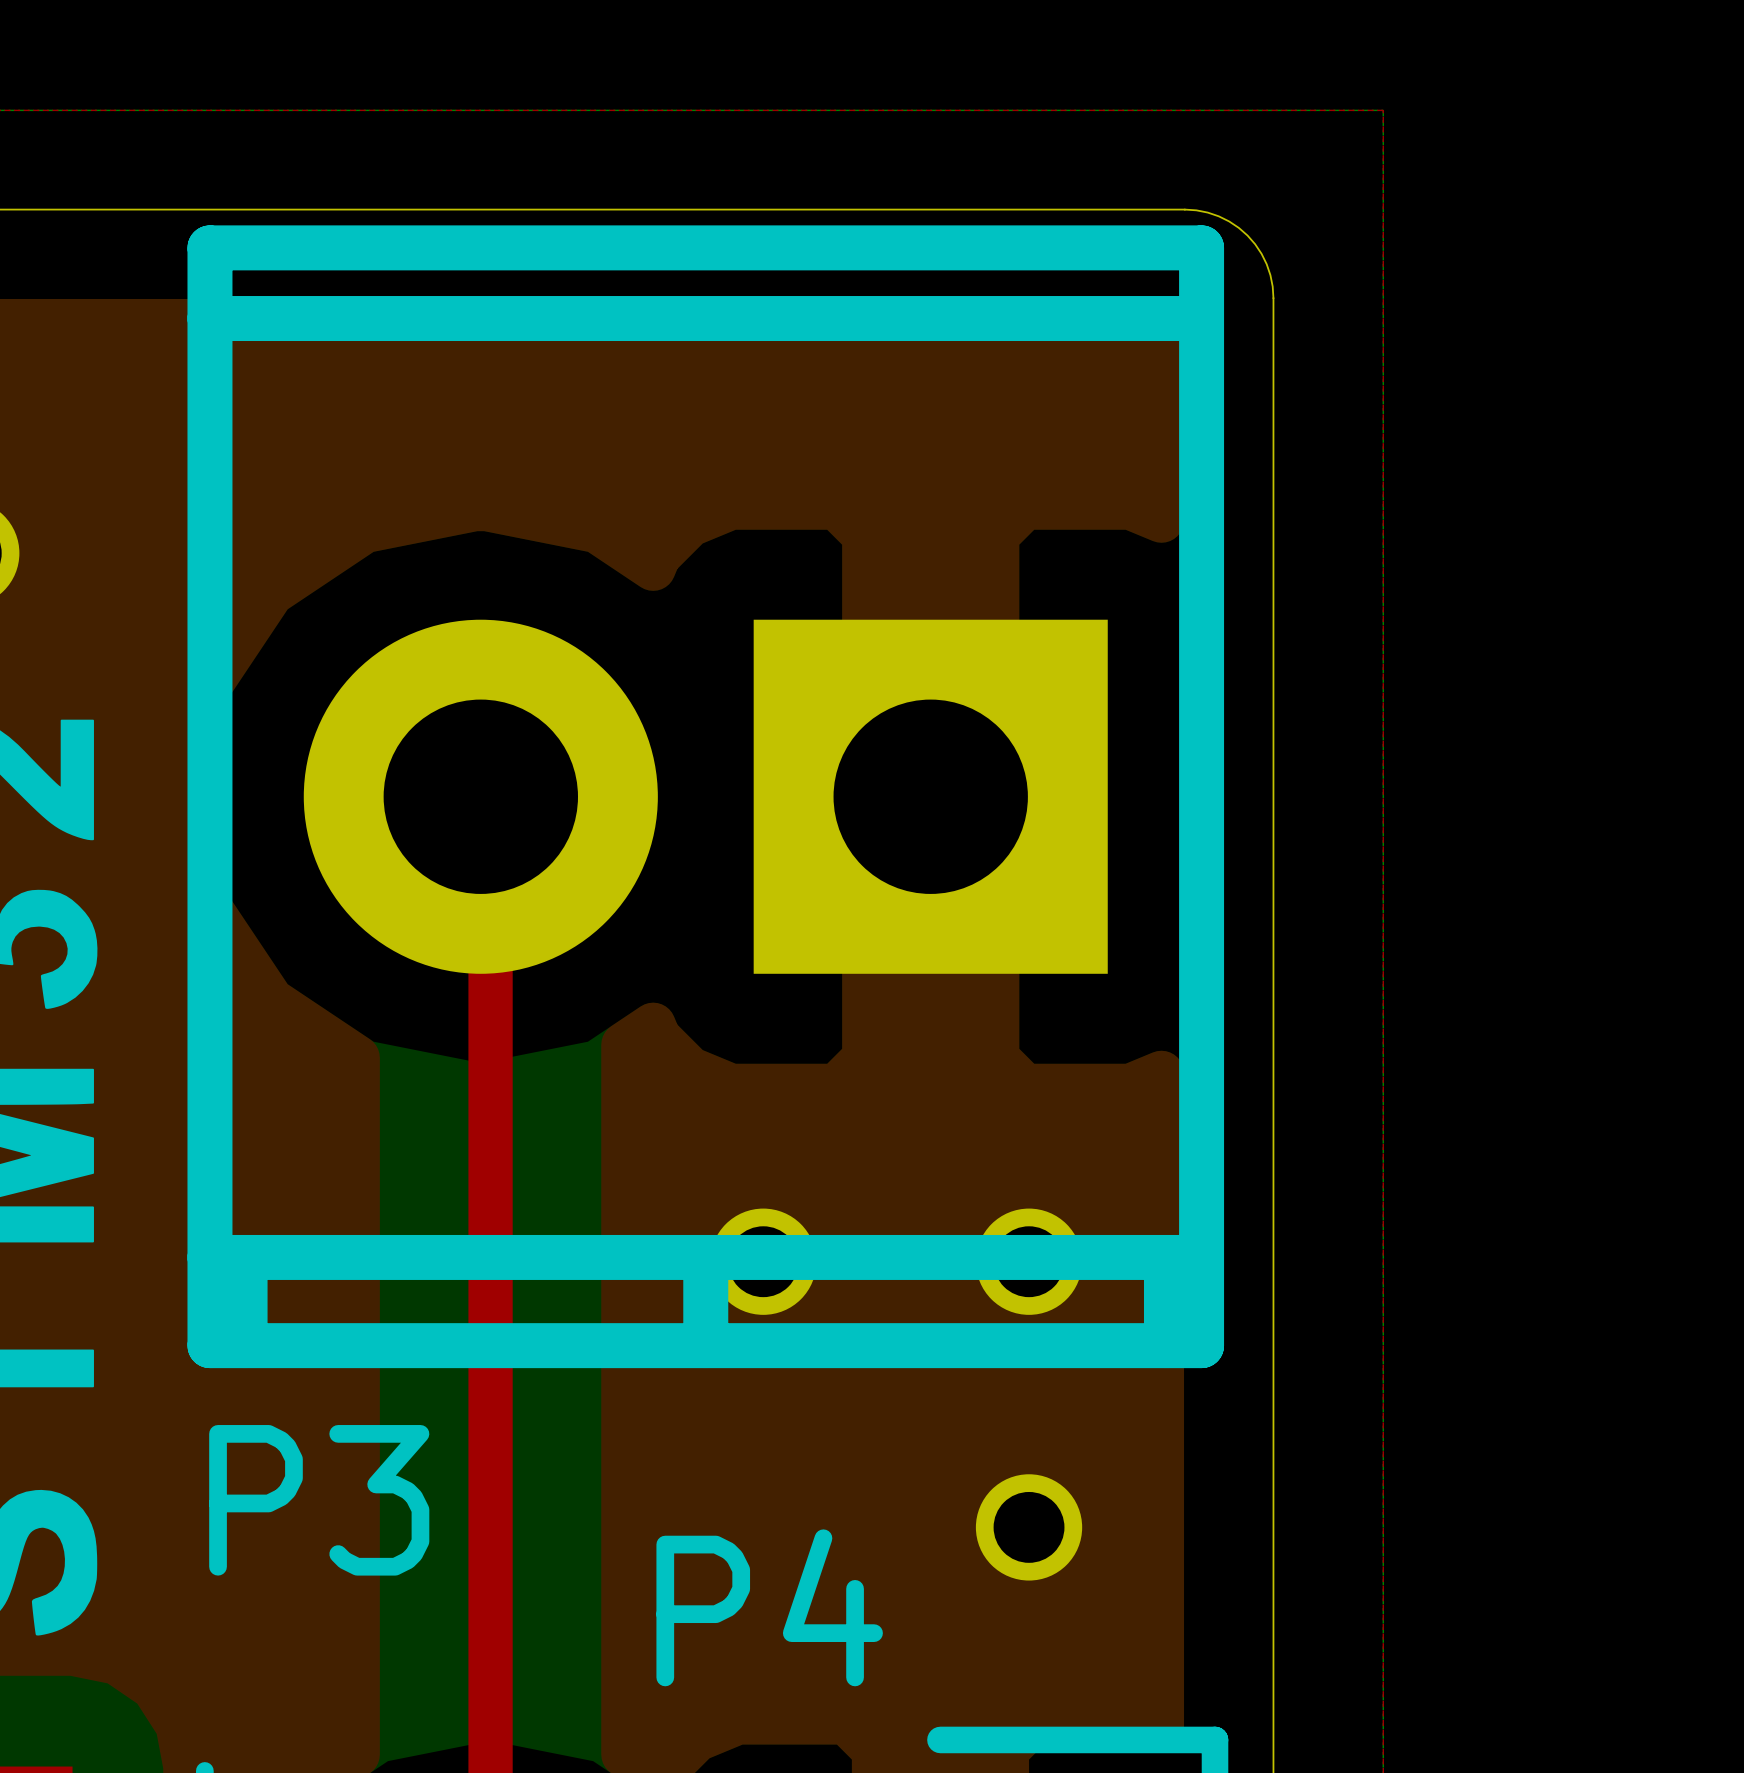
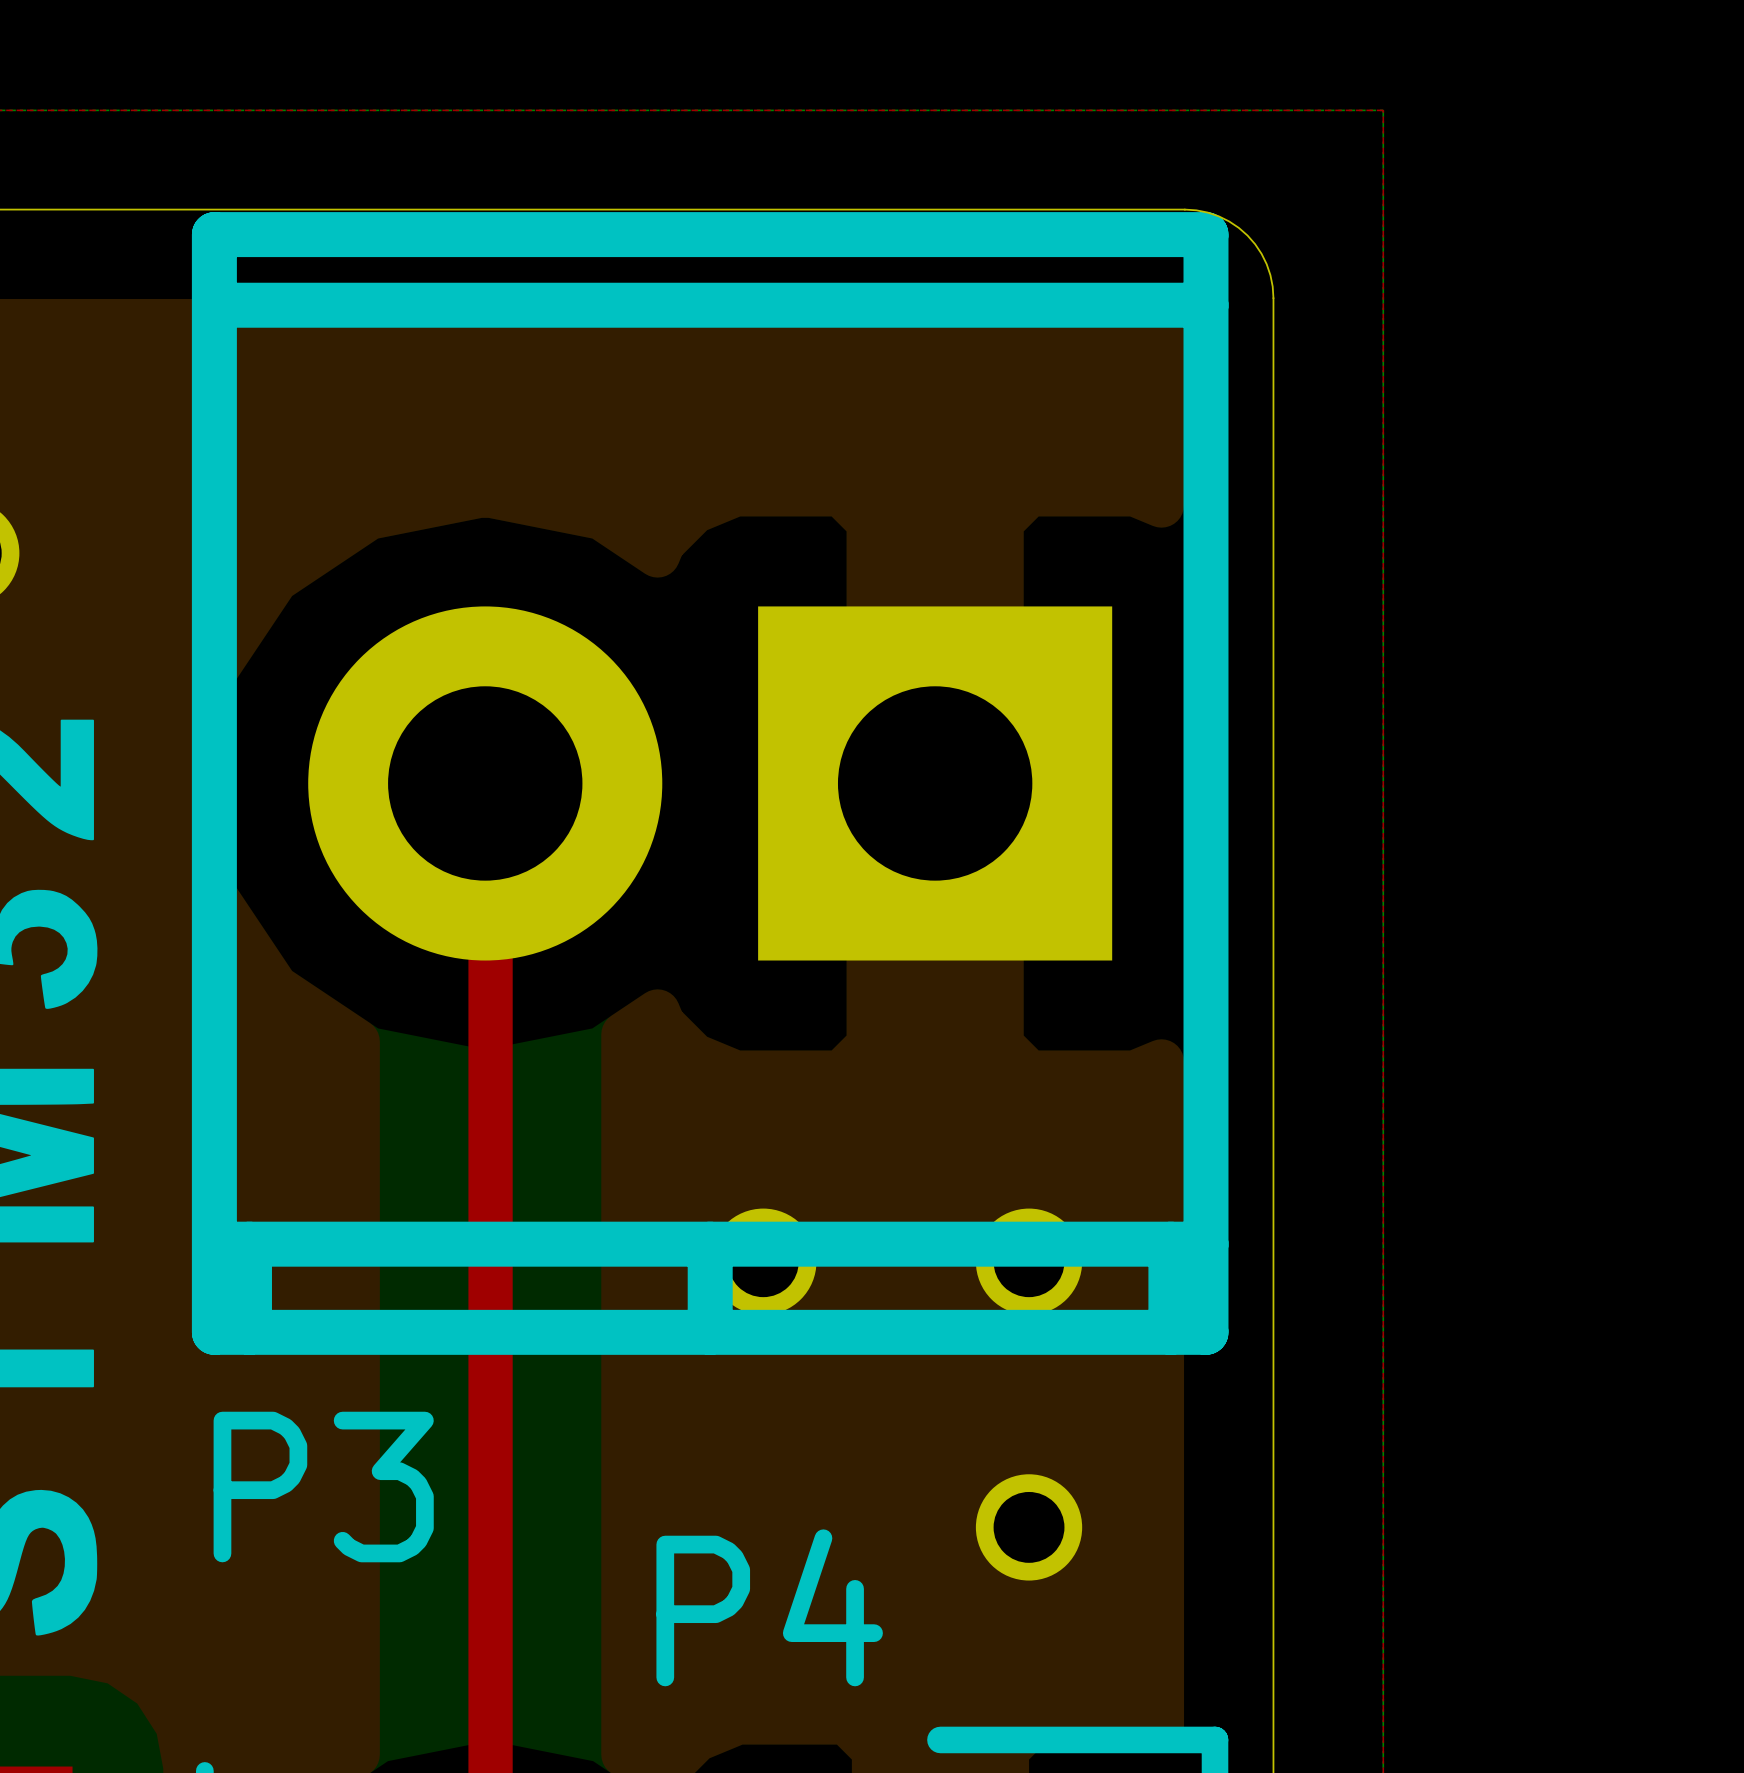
P3 position: (705, 796) -> (710, 783)

